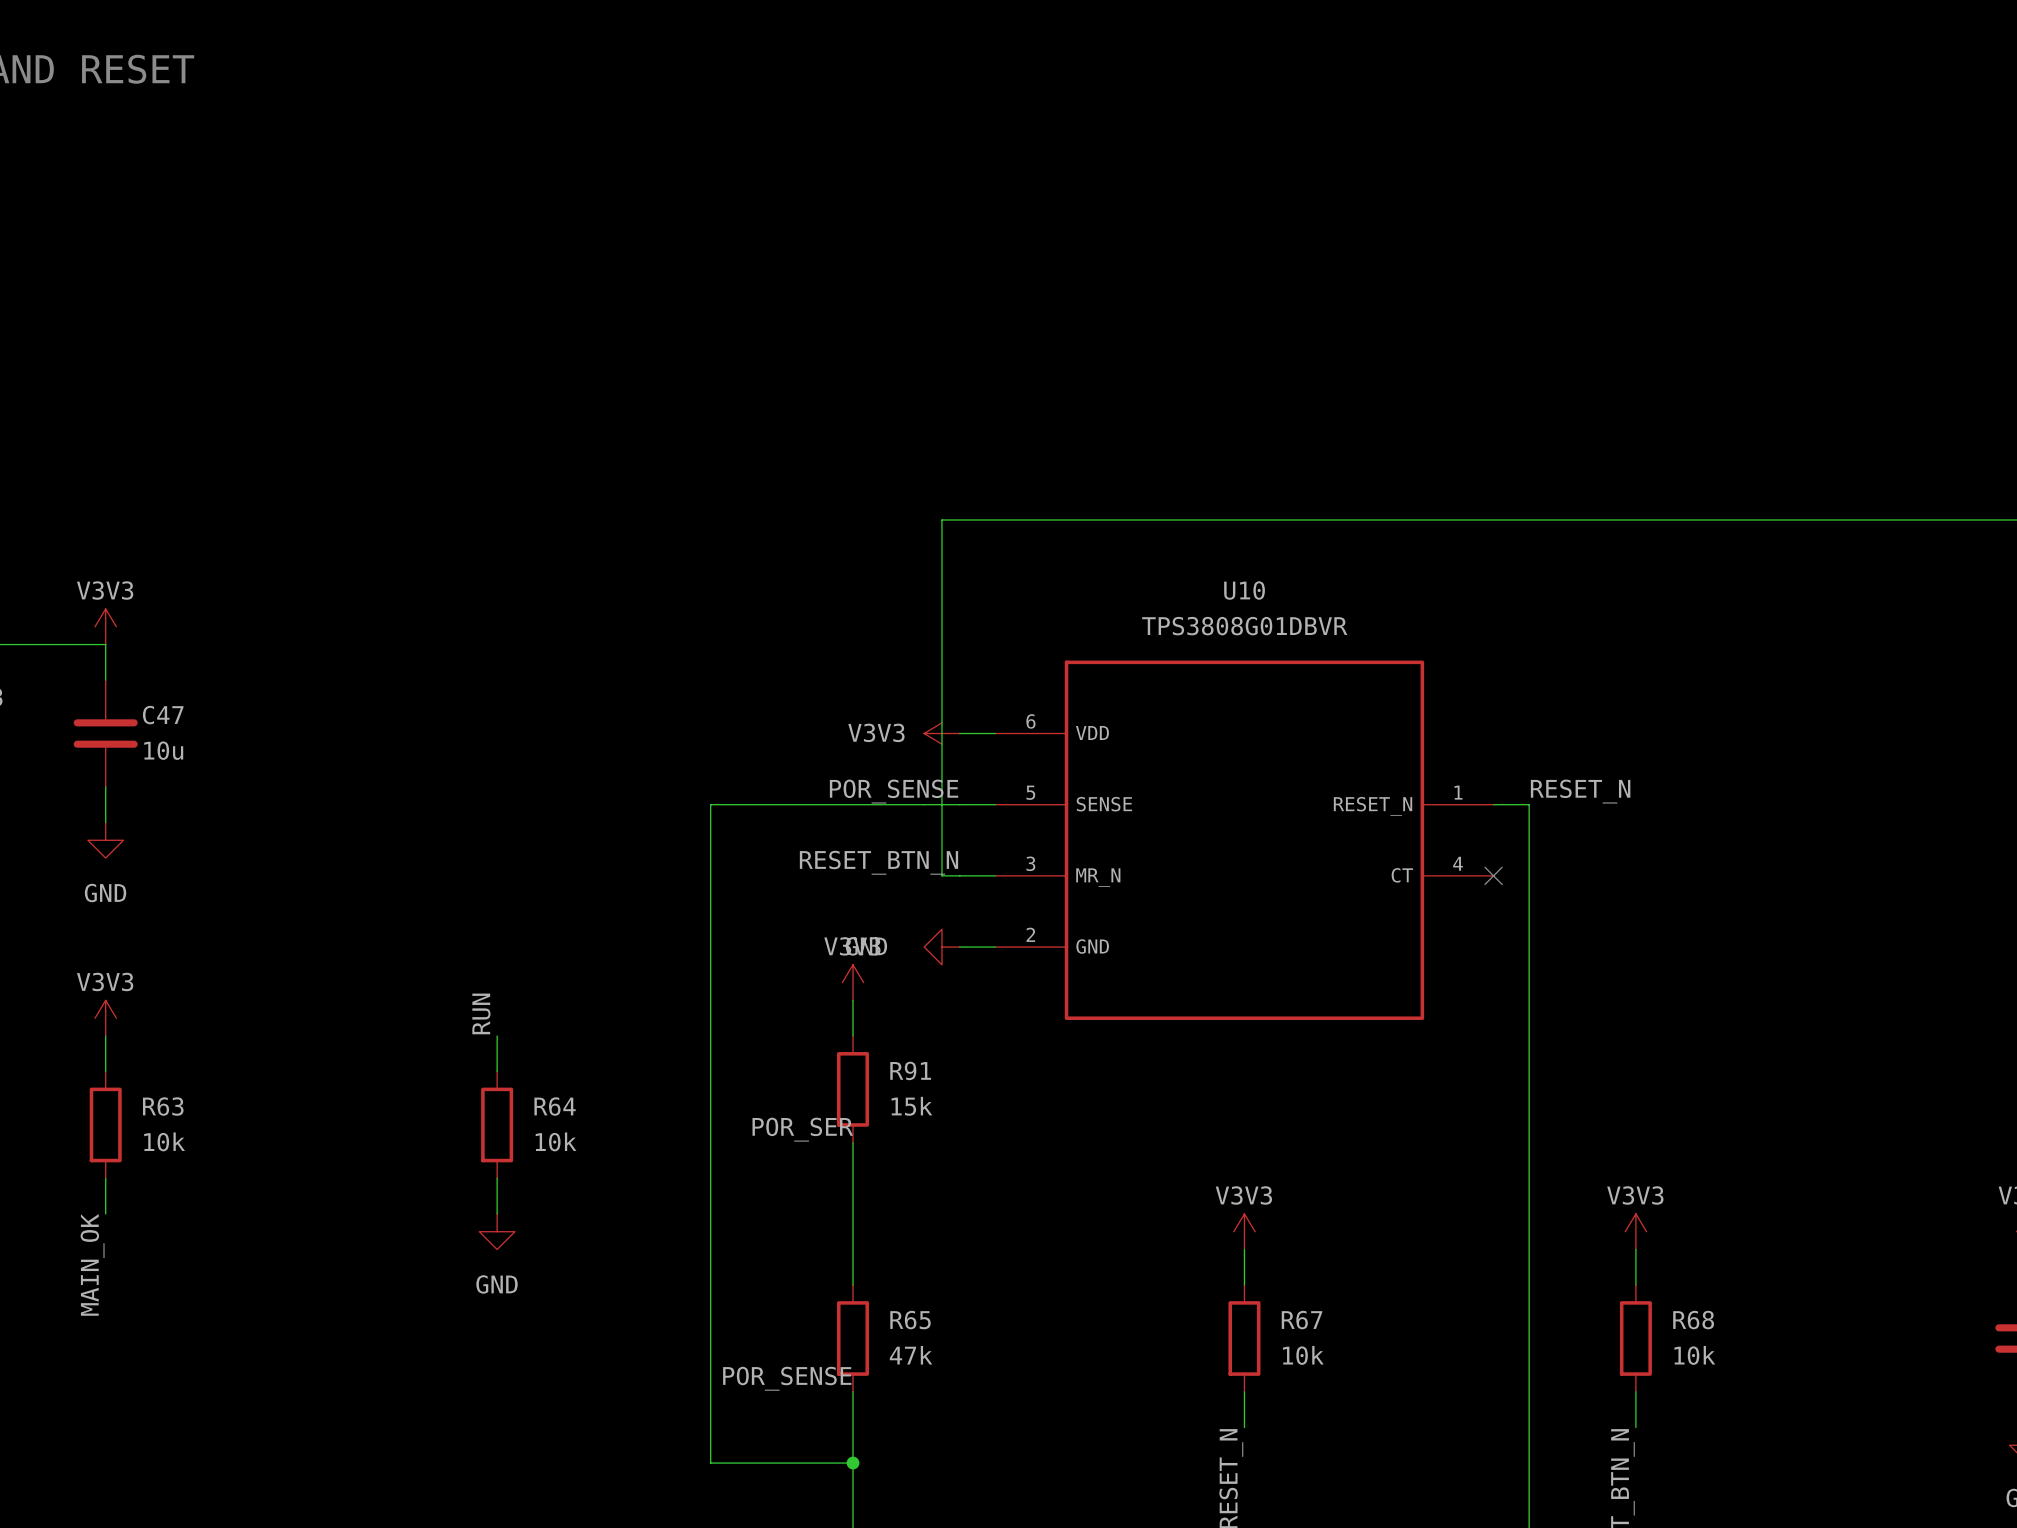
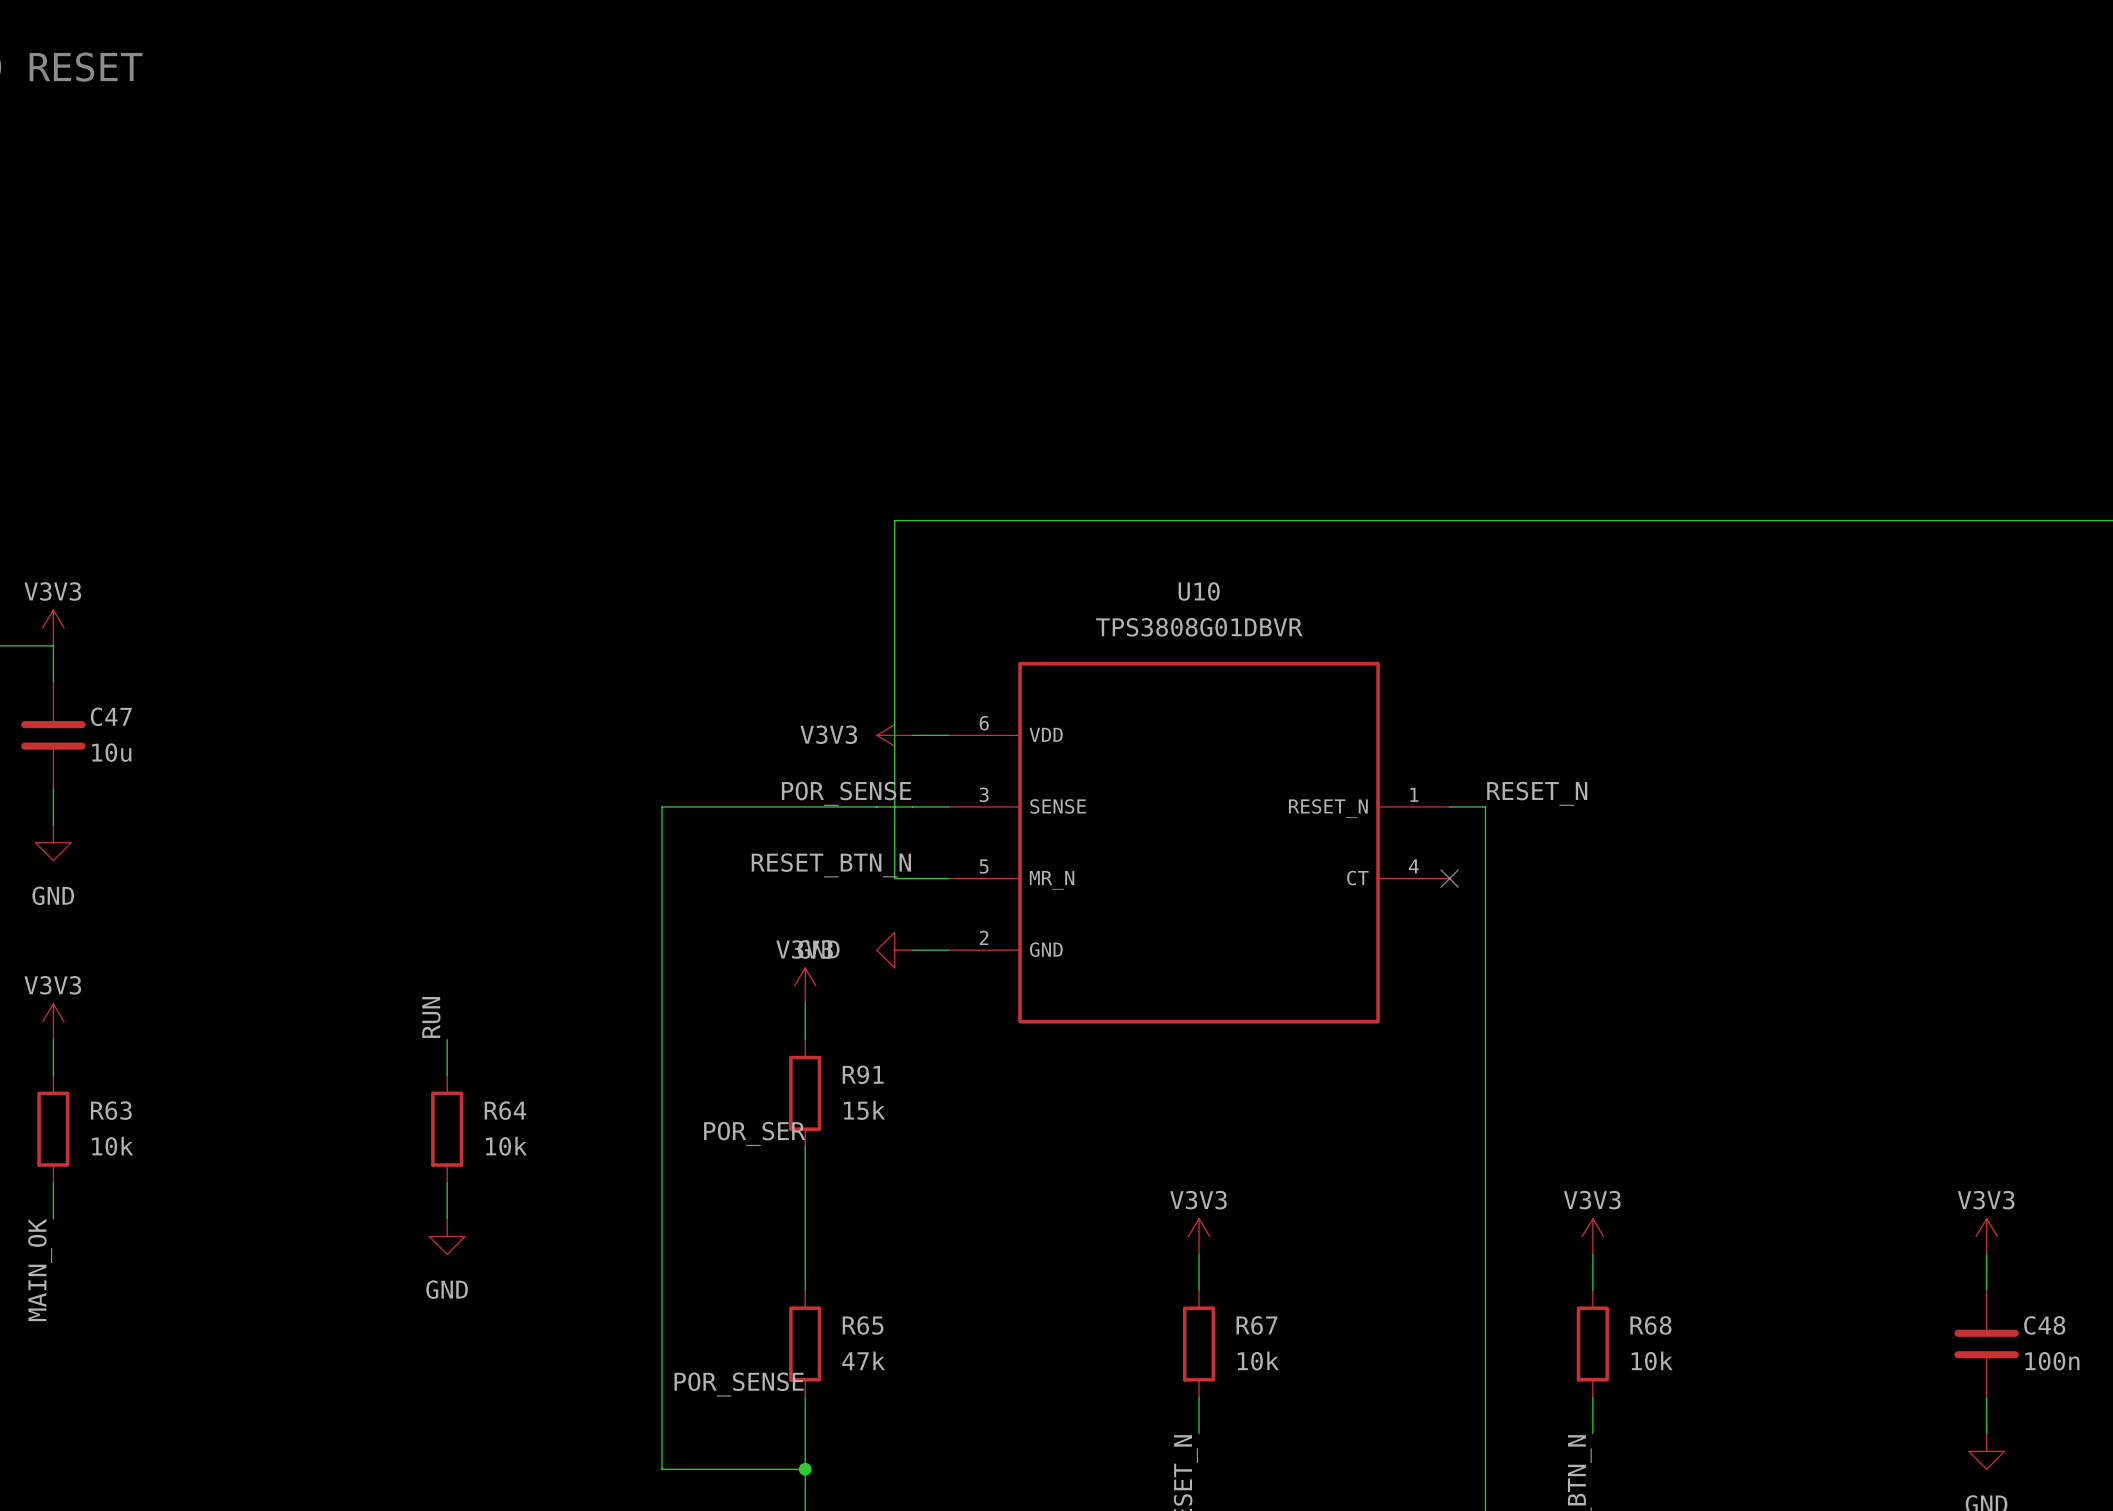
U10 pin number: 5 (1030, 792) -> 3 (984, 794)
U10 pin number: 3 (1030, 863) -> 5 (984, 866)

